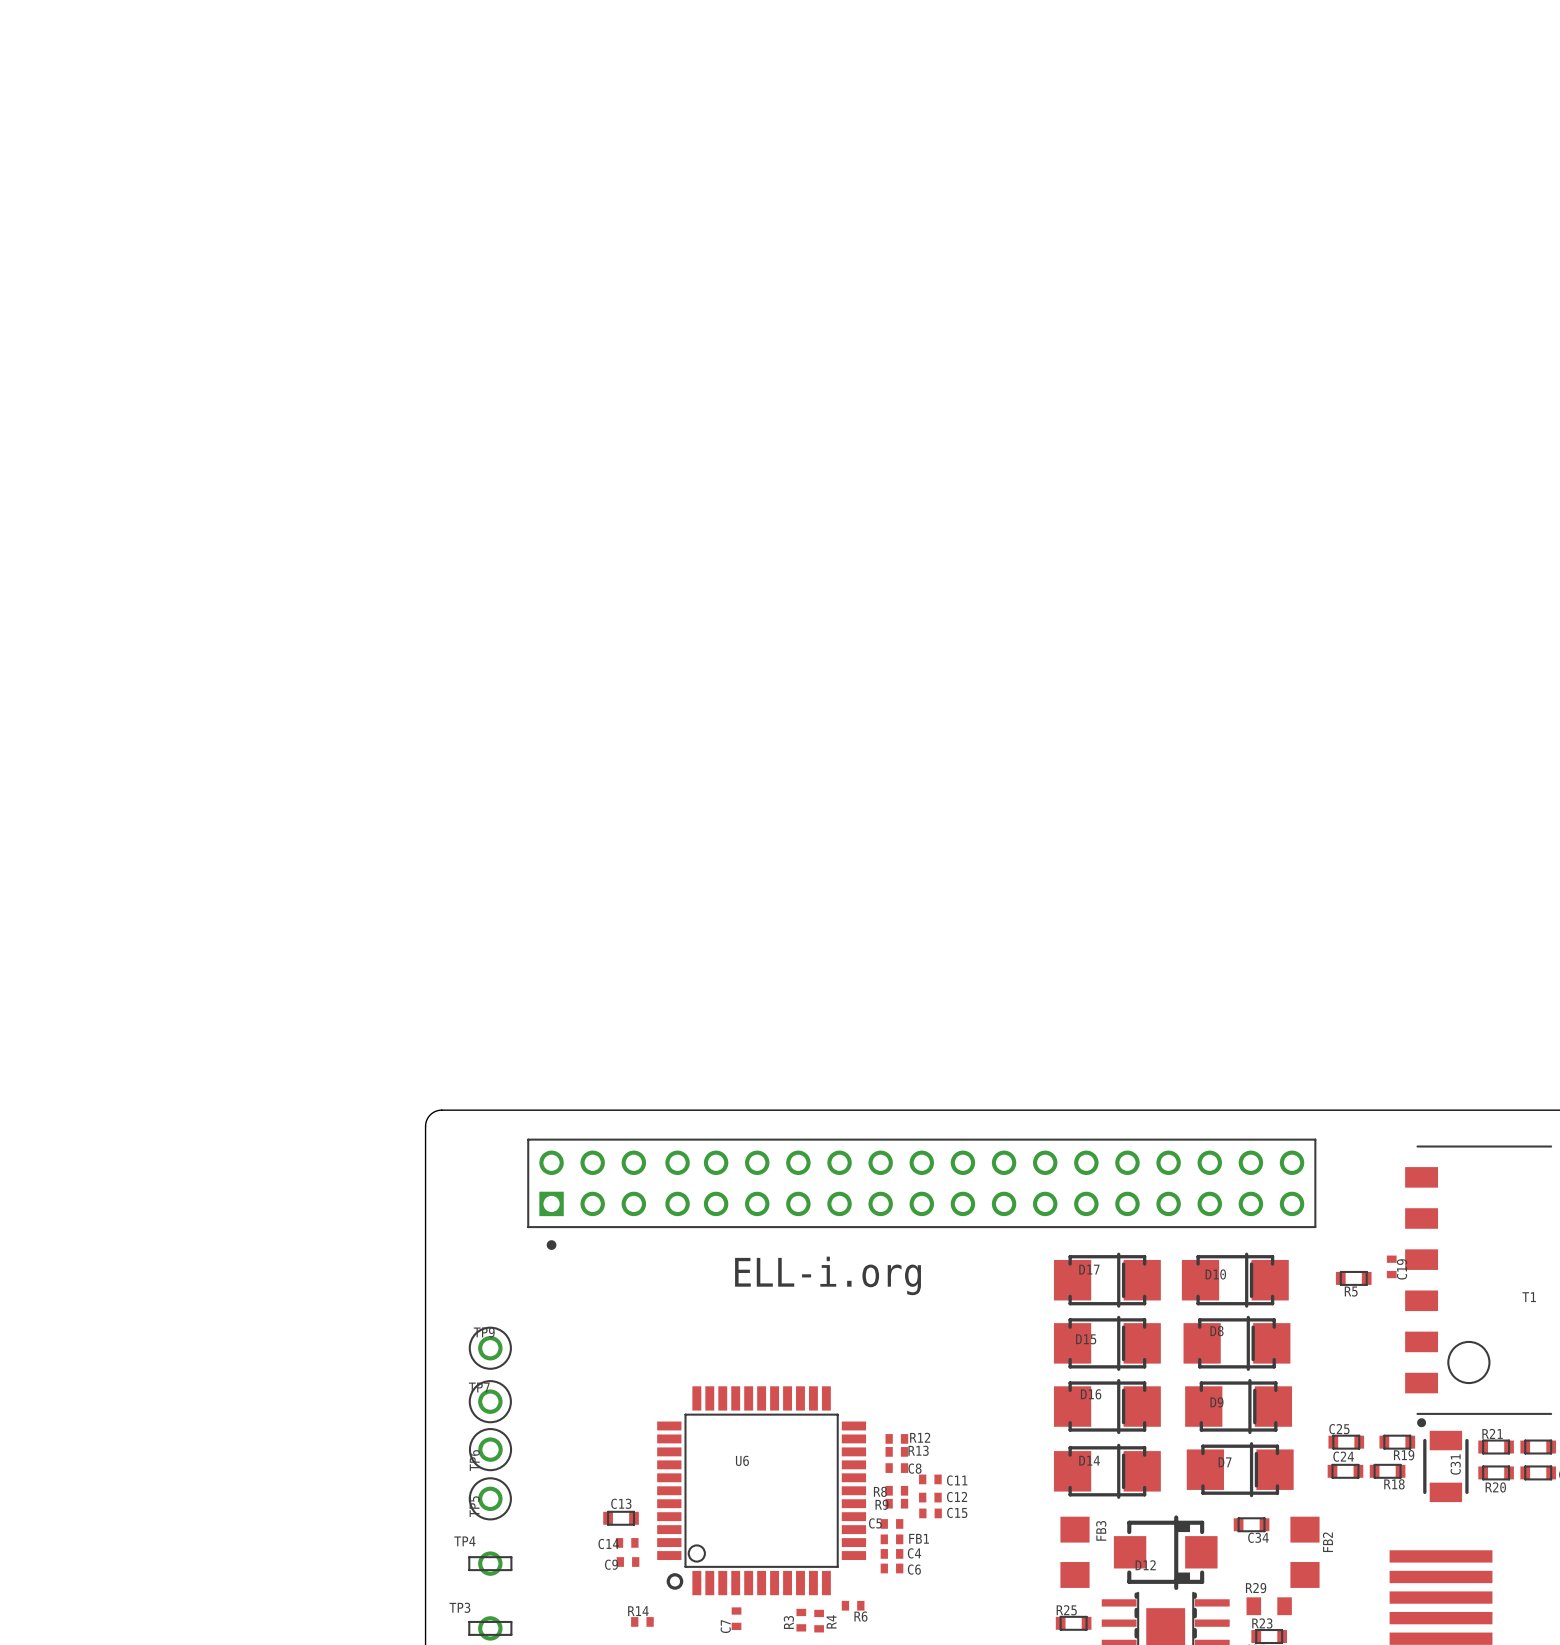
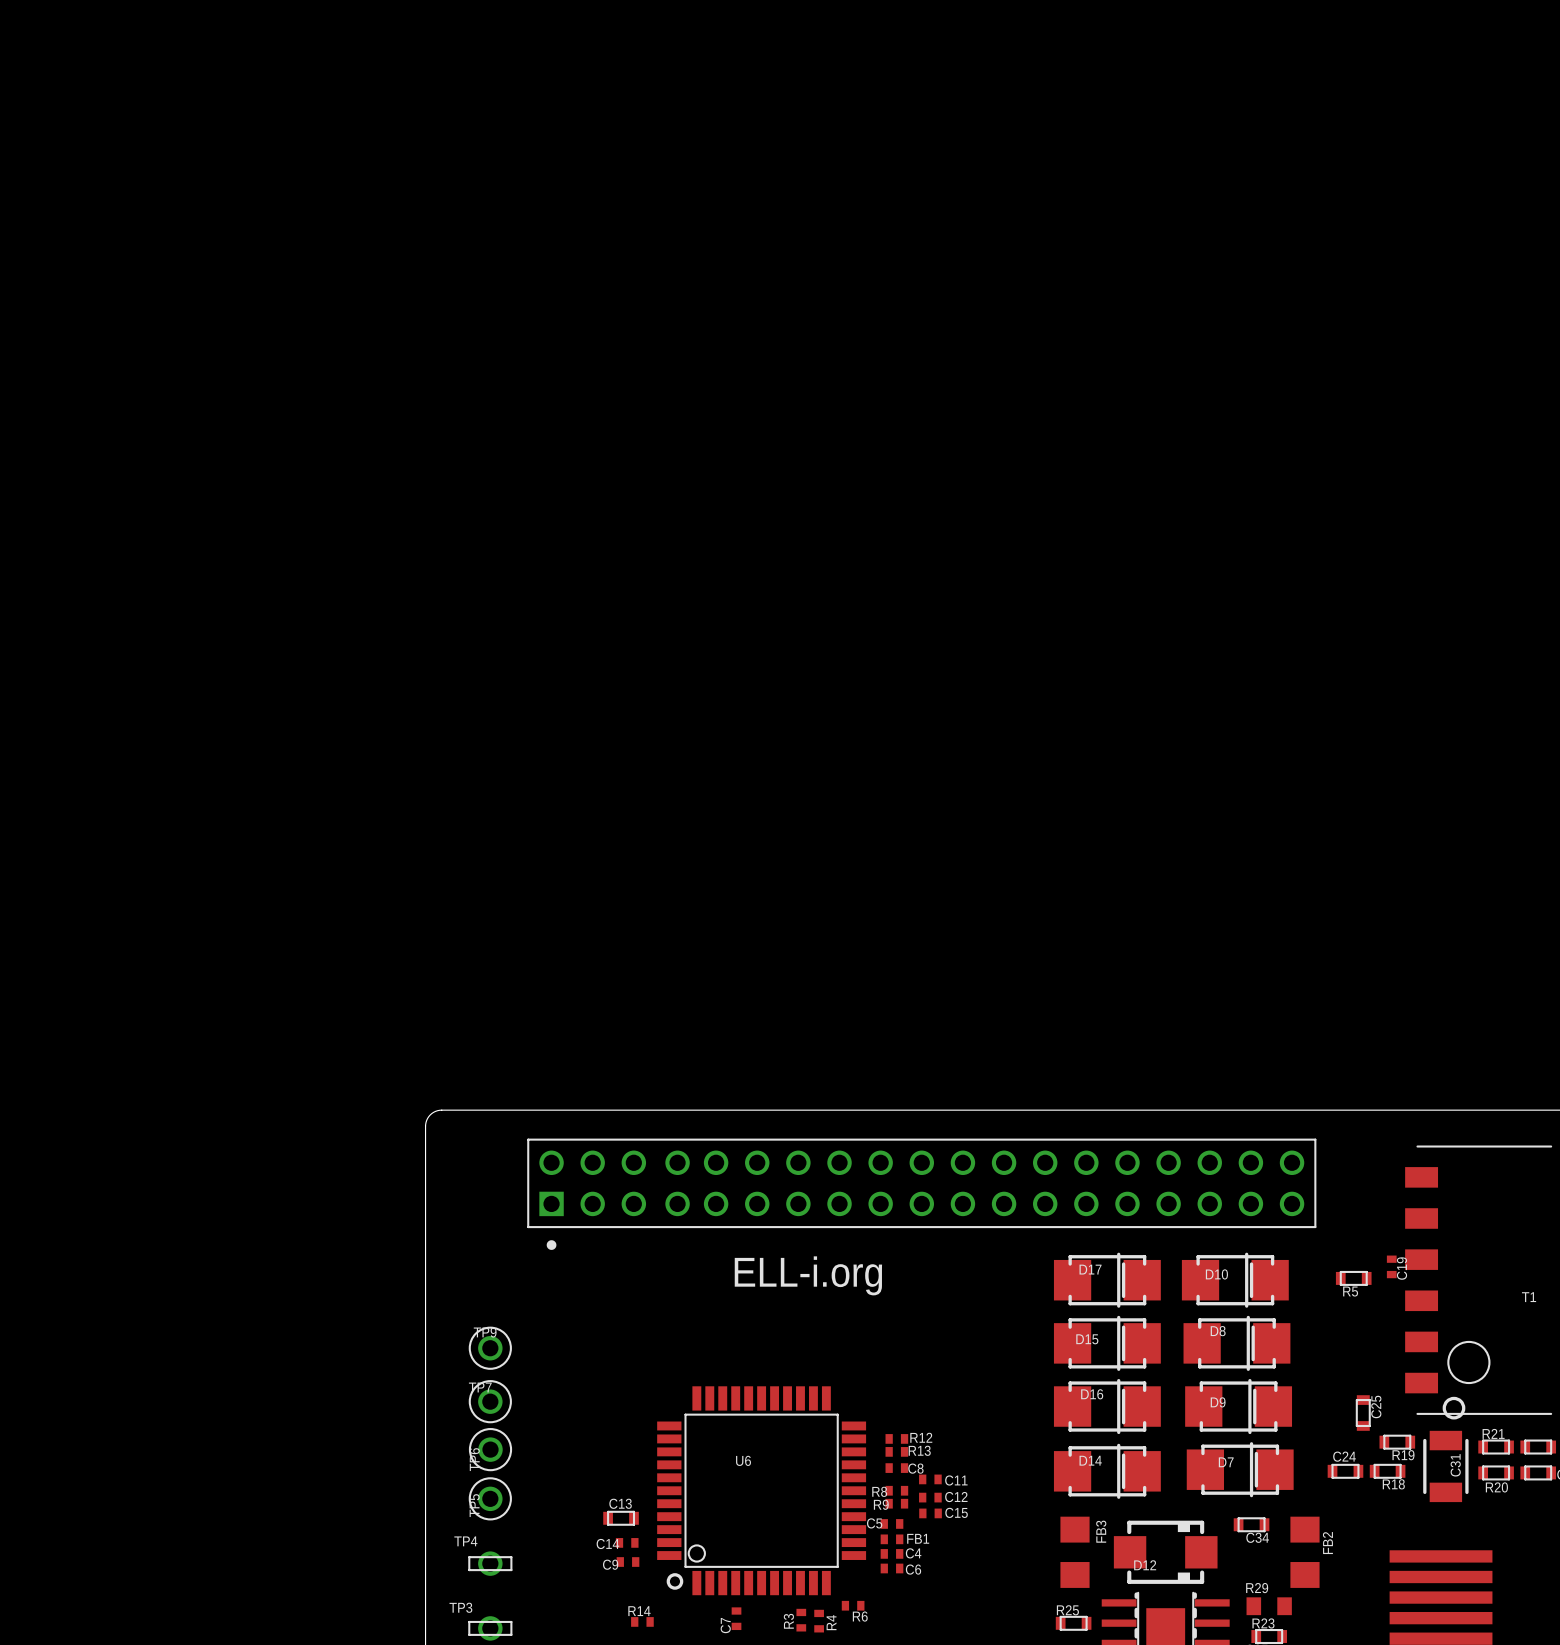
drawing: none -> [1442, 1396, 1466, 1420]
drawing: [1417, 1418, 1427, 1428] -> none
C25 rotation: 0° (1346, 1442) -> 90° clockwise (1363, 1413)
C25 position: (1346, 1442) -> (1363, 1413)
line: (1176, 1517) (1176, 1587) -> none

